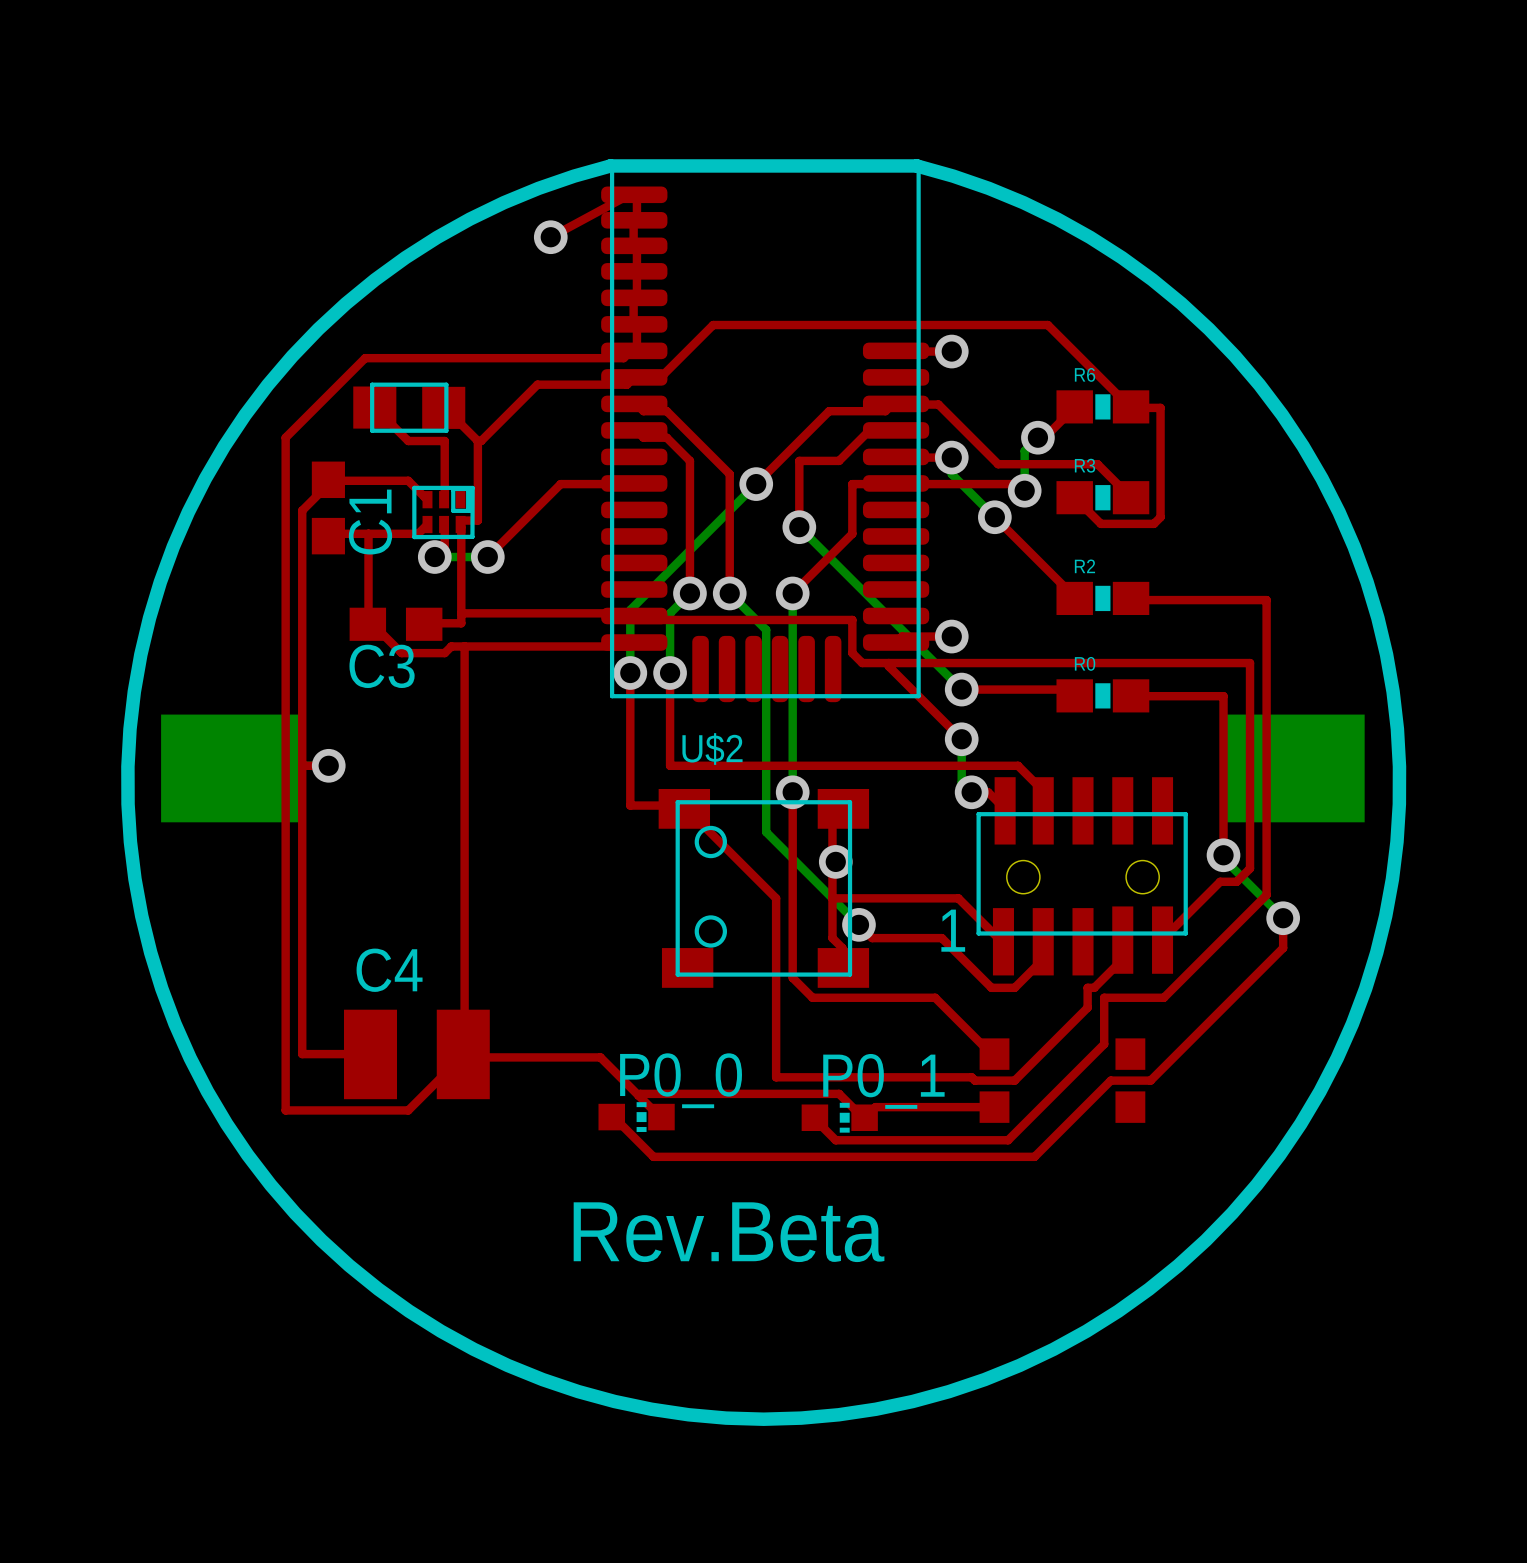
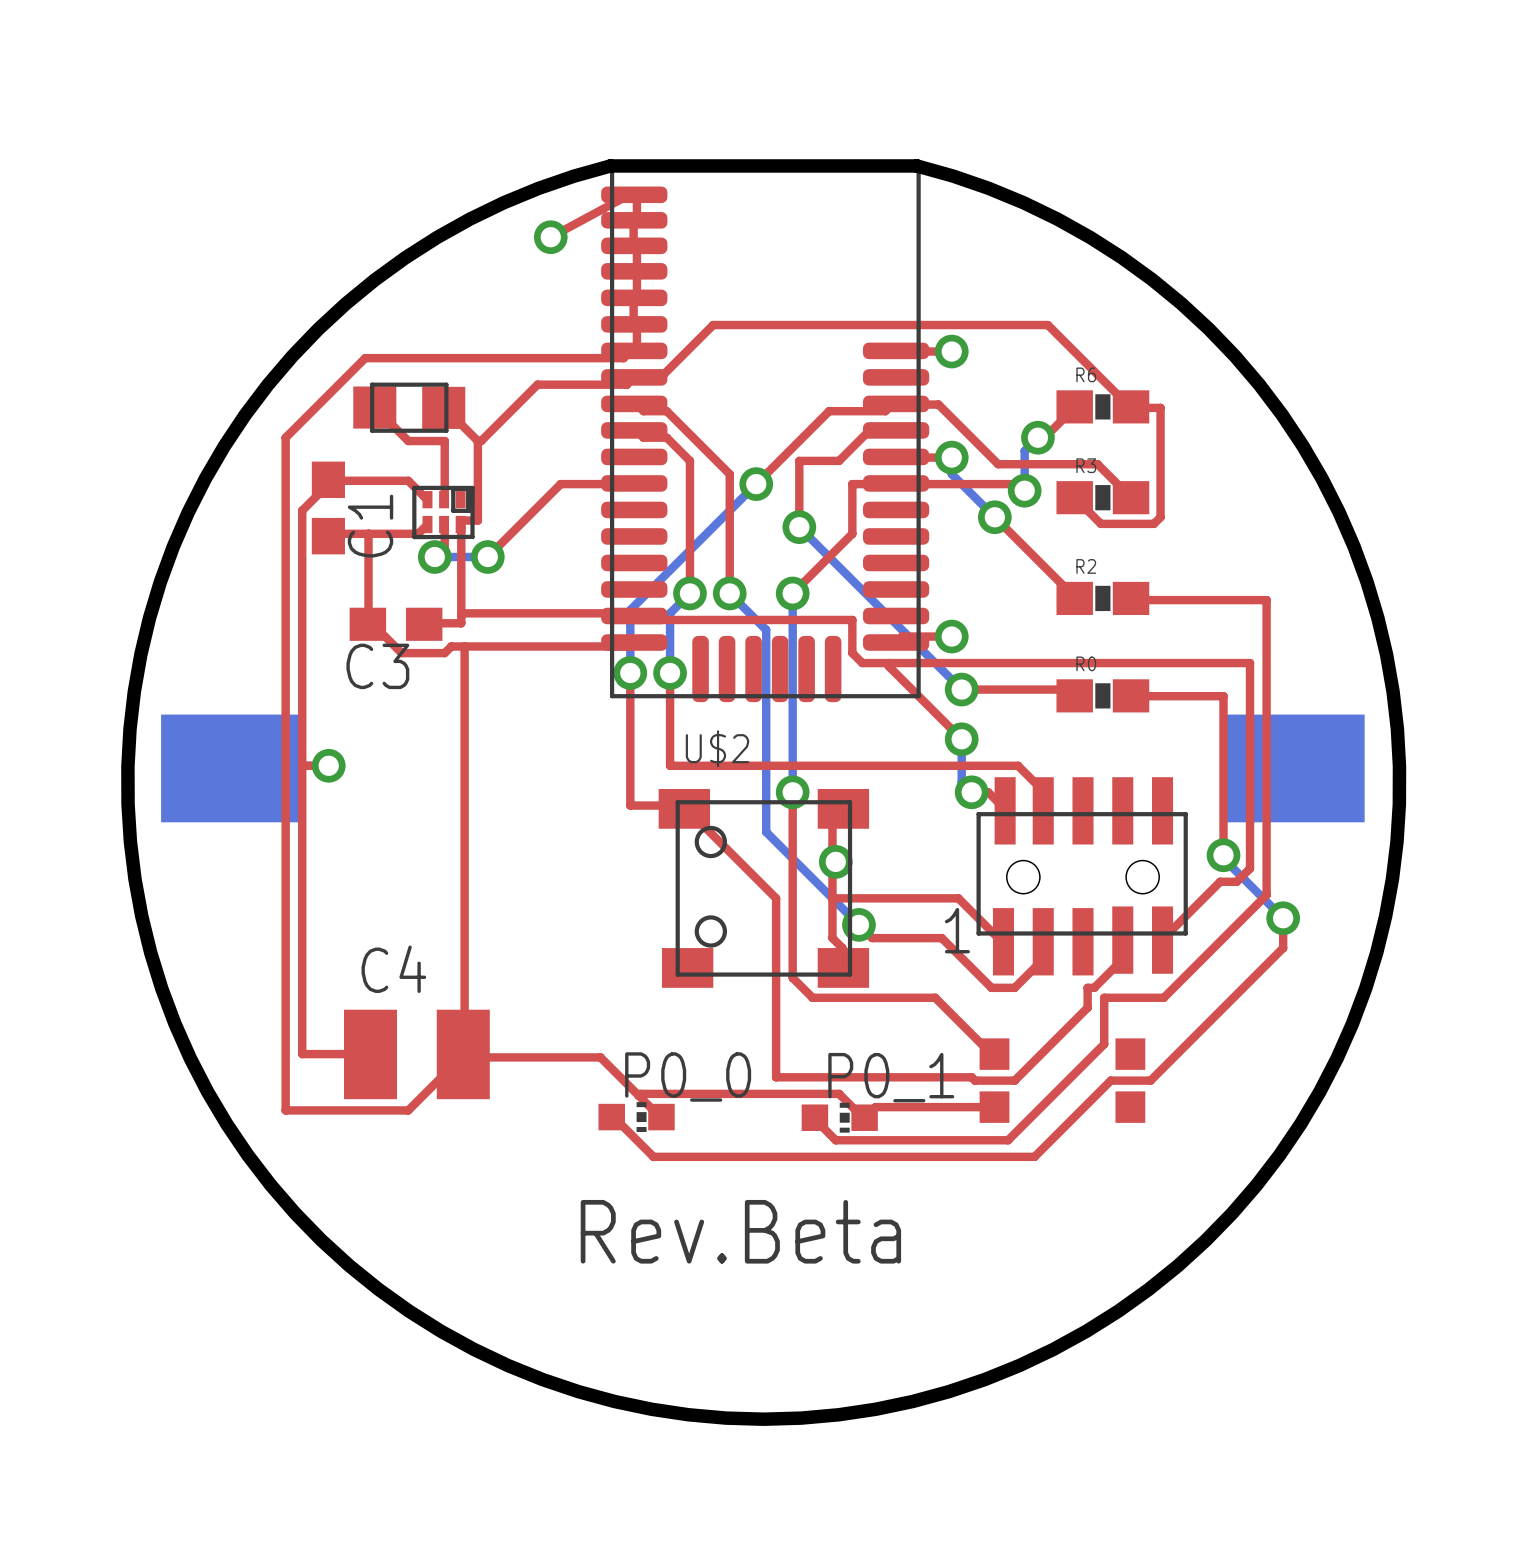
line: (610, 165) (916, 165) (988, 188) (1023, 202) (1090, 237) (1121, 257) (1181, 303) (1235, 356) (1259, 384) (1303, 446) (1339, 512) (1354, 546) (1377, 618) (1386, 654) (1397, 729) (1399, 804) (1392, 879) (1376, 952) (1365, 988) (1352, 1023) (1319, 1091) (1279, 1155) (1232, 1213) (1178, 1265) (1148, 1289) (1118, 1311) (1053, 1349) (984, 1379) (912, 1401) (875, 1409) (801, 1418) (726, 1418) (651, 1409) (578, 1391) (542, 1379) (473, 1349) (440, 1331) (409, 1311) (349, 1265) (295, 1213) (247, 1155) (207, 1091) (190, 1058) (161, 988) (150, 952) (134, 879) (128, 804) (130, 729) (134, 691) (149, 618) (173, 546) (188, 512) (224, 446) (267, 384) (292, 356) (345, 303) (405, 257) (437, 237) (503, 202) (538, 188) (610, 165) -> none
board edge: none -> (610, 165) (916, 165) (988, 188) (1023, 202) (1090, 237) (1121, 257) (1181, 303) (1235, 356) (1259, 384) (1303, 446) (1339, 512) (1354, 546) (1377, 618) (1386, 654) (1397, 729) (1399, 804) (1392, 879) (1376, 952) (1365, 988) (1352, 1023) (1319, 1091) (1279, 1155) (1232, 1213) (1178, 1265) (1148, 1289) (1118, 1311) (1053, 1349) (984, 1379) (912, 1401) (875, 1409) (801, 1418) (726, 1418) (651, 1409) (578, 1391) (542, 1379) (473, 1349) (440, 1331) (409, 1311) (349, 1265) (295, 1213) (247, 1155) (207, 1091) (190, 1058) (161, 988) (150, 952) (134, 879) (128, 804) (130, 729) (134, 691) (149, 618) (173, 546) (188, 512) (224, 446) (267, 384) (292, 356) (345, 303) (405, 257) (437, 237) (503, 202) (538, 188) (610, 165)

